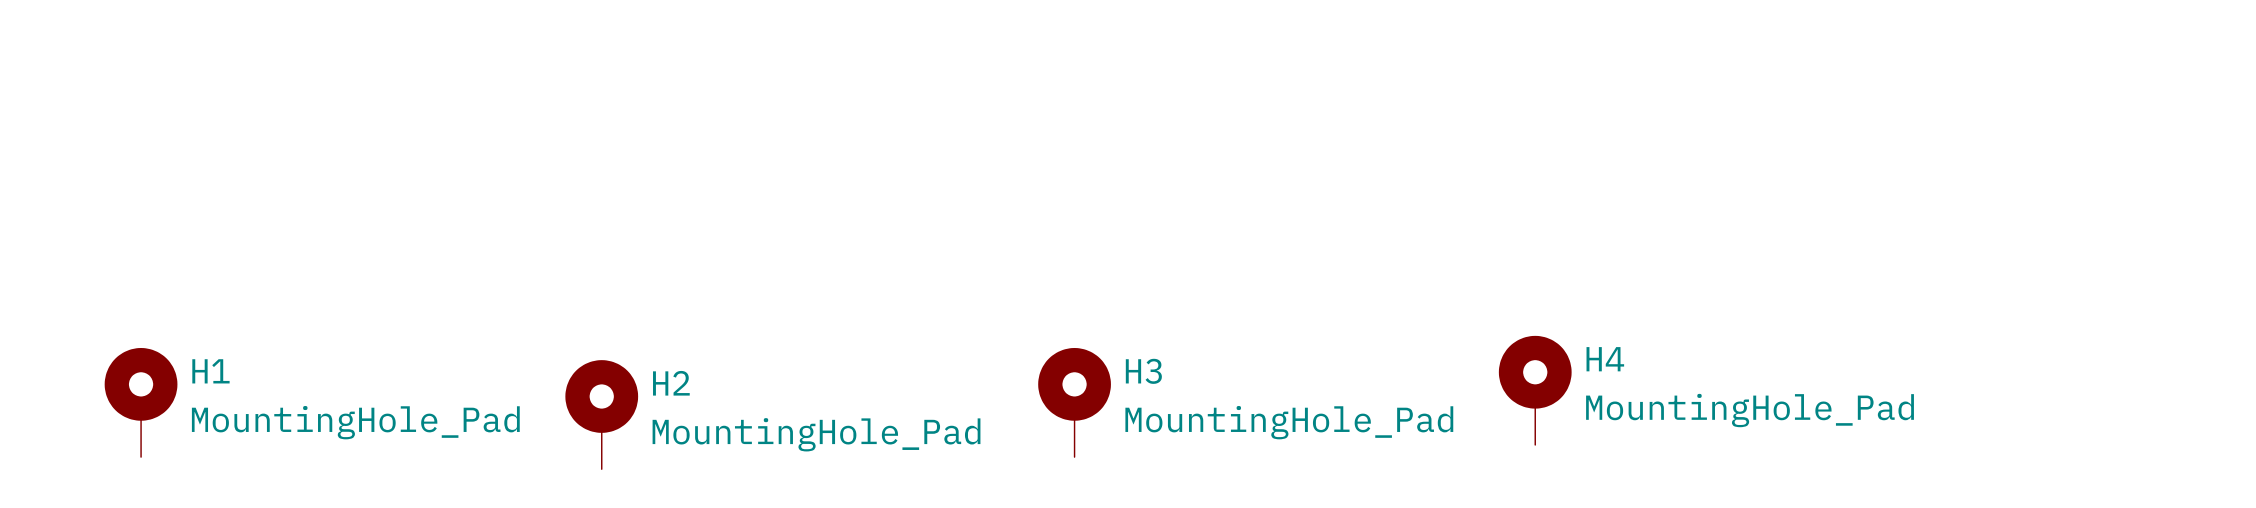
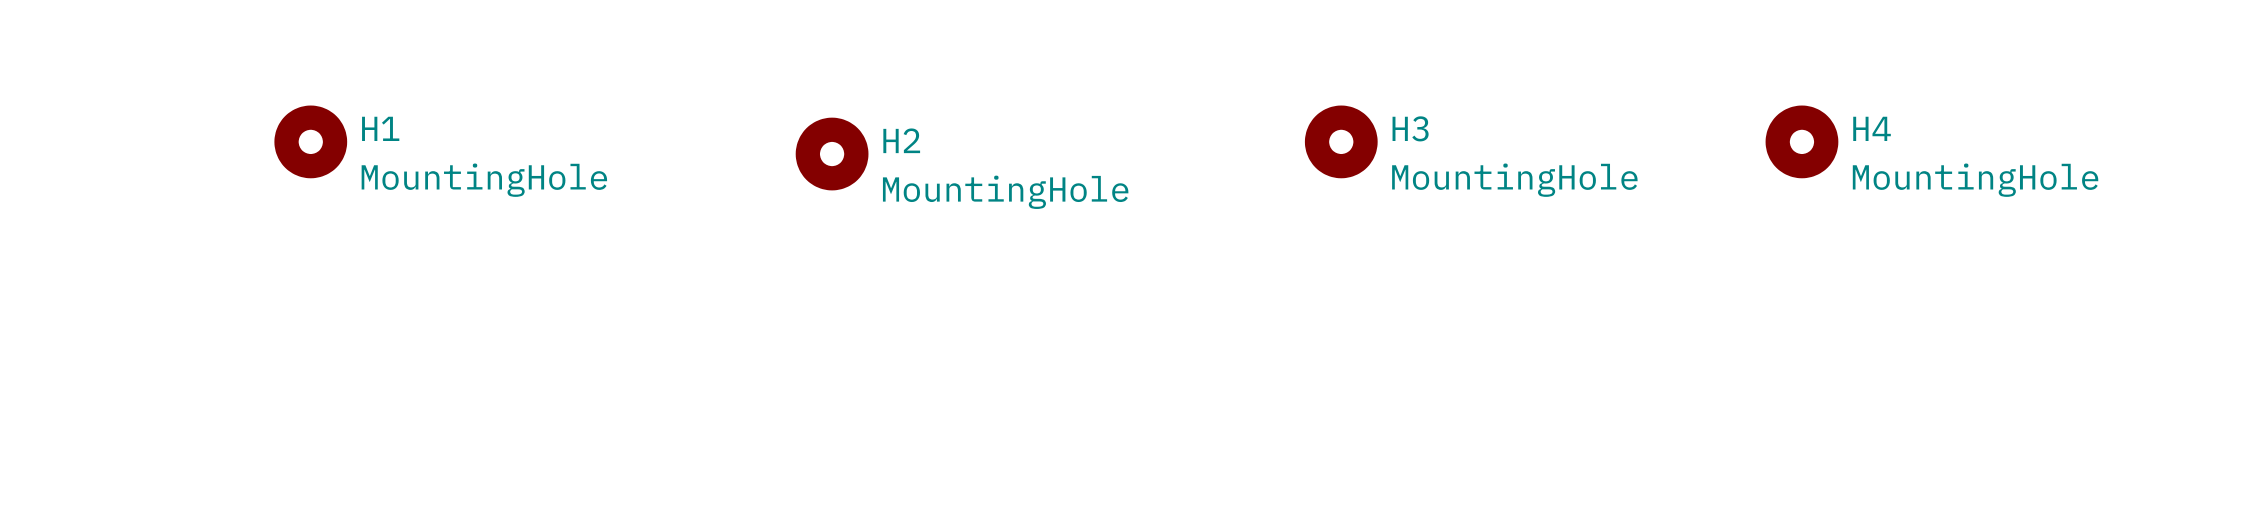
H4 symbol: [1498, 335, 1572, 445] -> [1765, 105, 1839, 179]
H1 symbol: [104, 348, 178, 458] -> [274, 105, 348, 179]
H3 symbol: [1038, 348, 1111, 458] -> [1304, 105, 1378, 179]
H2 symbol: [565, 360, 639, 470] -> [795, 117, 869, 191]
H4 value: MountingHole_Pad (1750, 410) -> MountingHole (1975, 180)
H1 value: MountingHole_Pad (355, 422) -> MountingHole (484, 180)
H3 value: MountingHole_Pad (1289, 422) -> MountingHole (1514, 180)
H2 value: MountingHole_Pad (816, 434) -> MountingHole (1005, 192)

